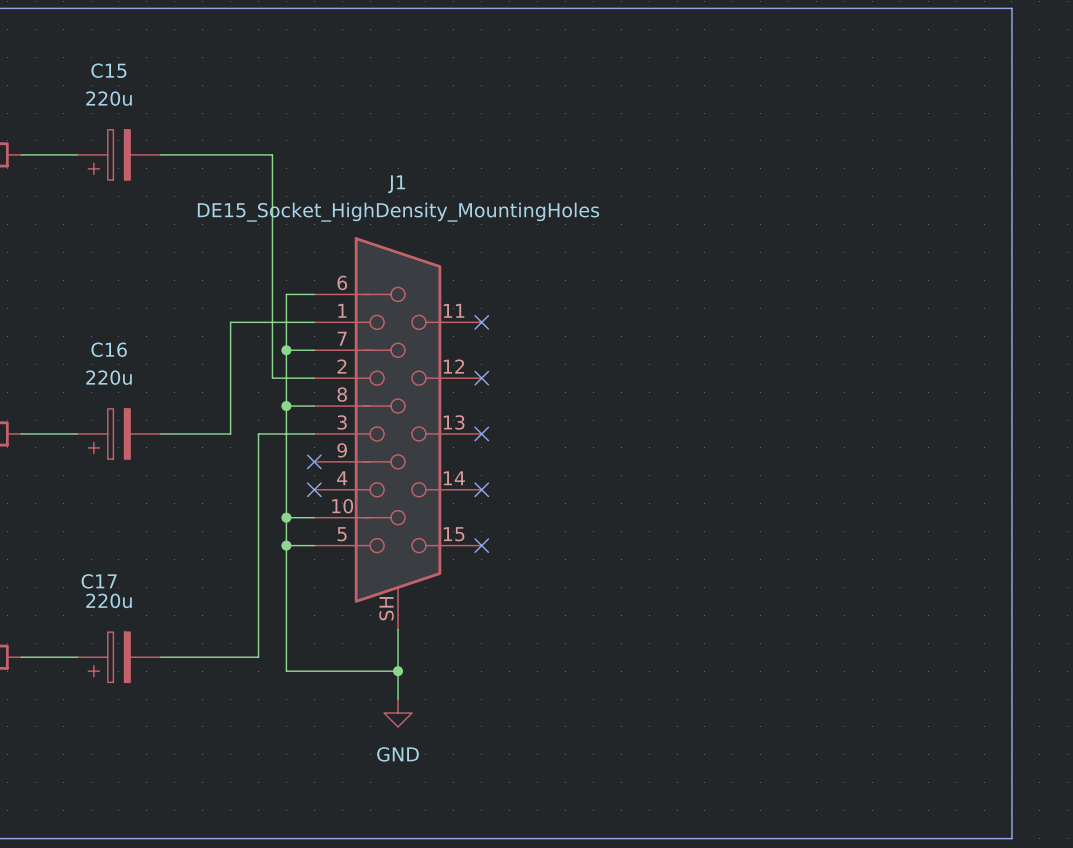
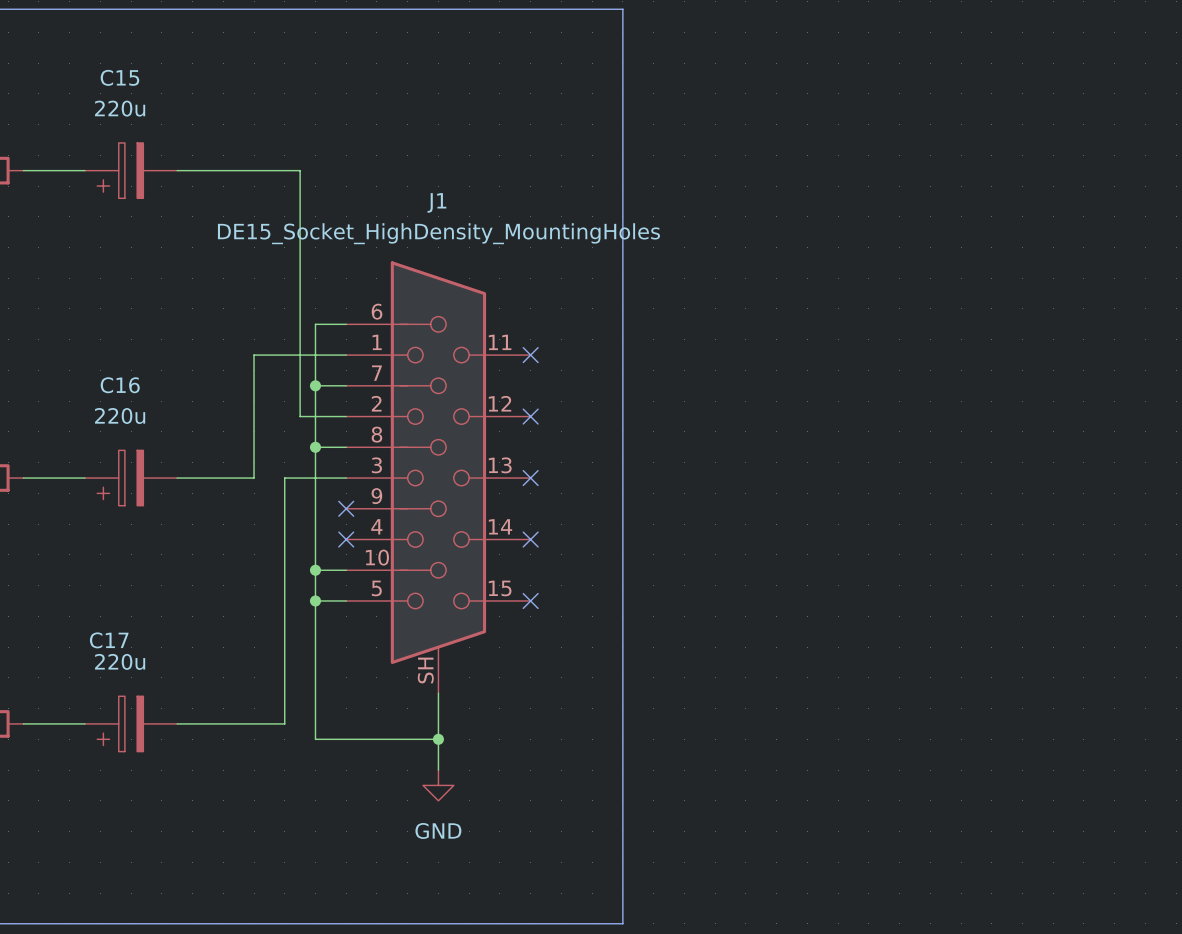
line: (565, 8) (1011, 8) (1011, 838) (565, 838) -> (622, 9) (622, 923)

